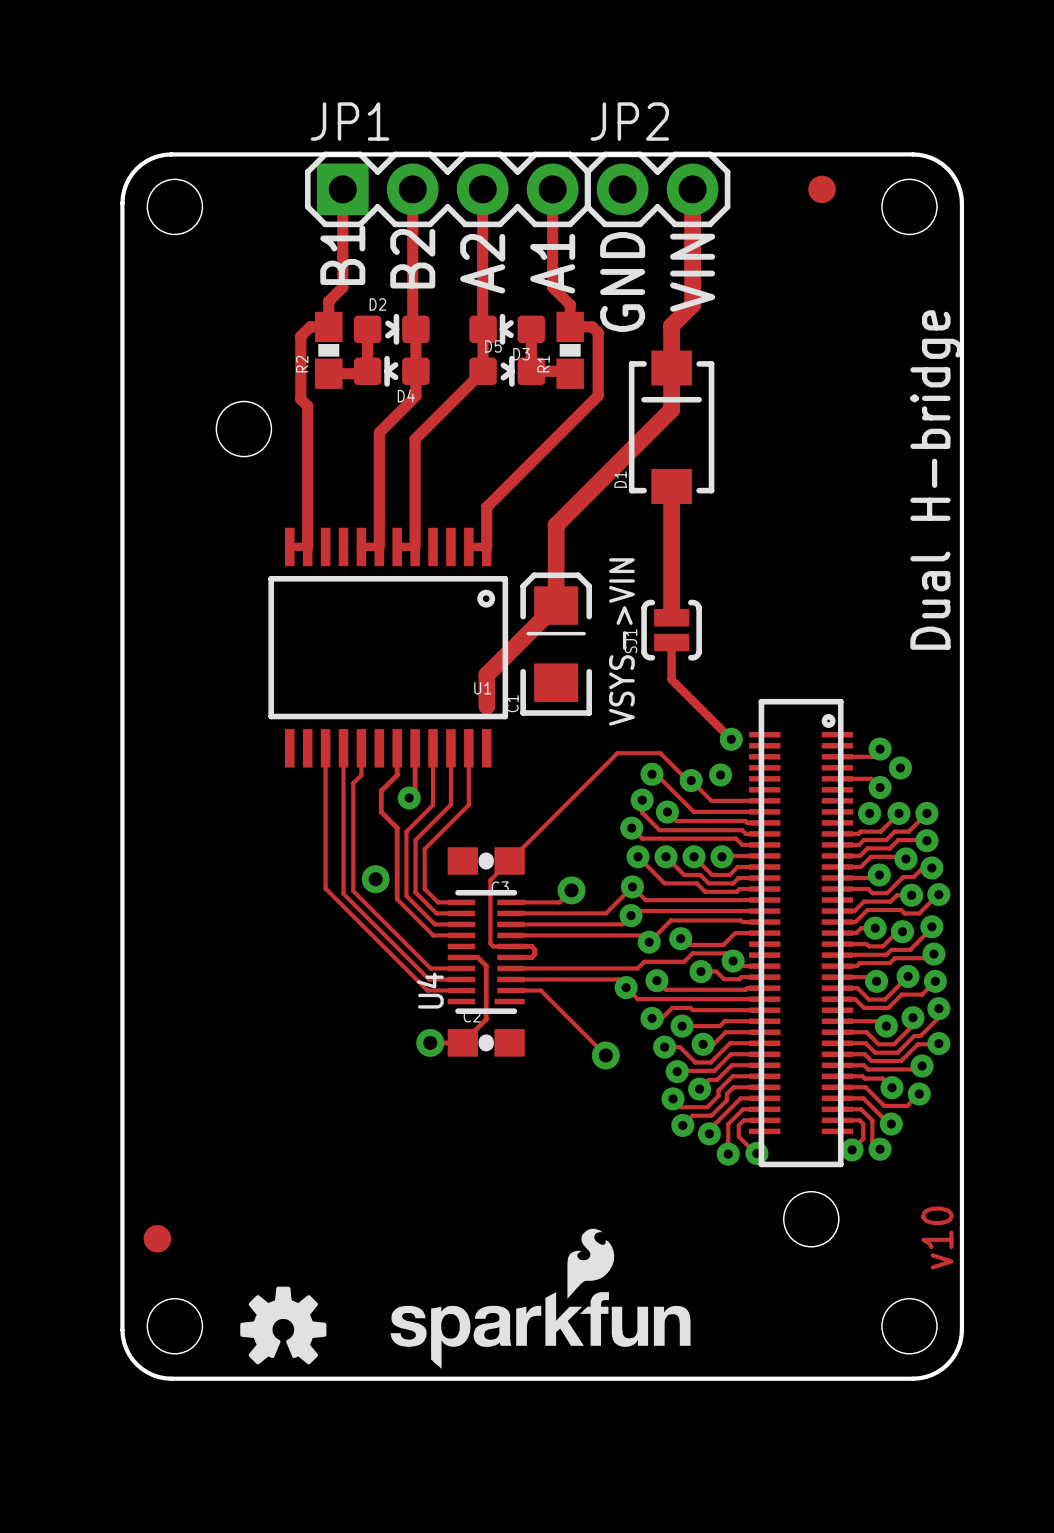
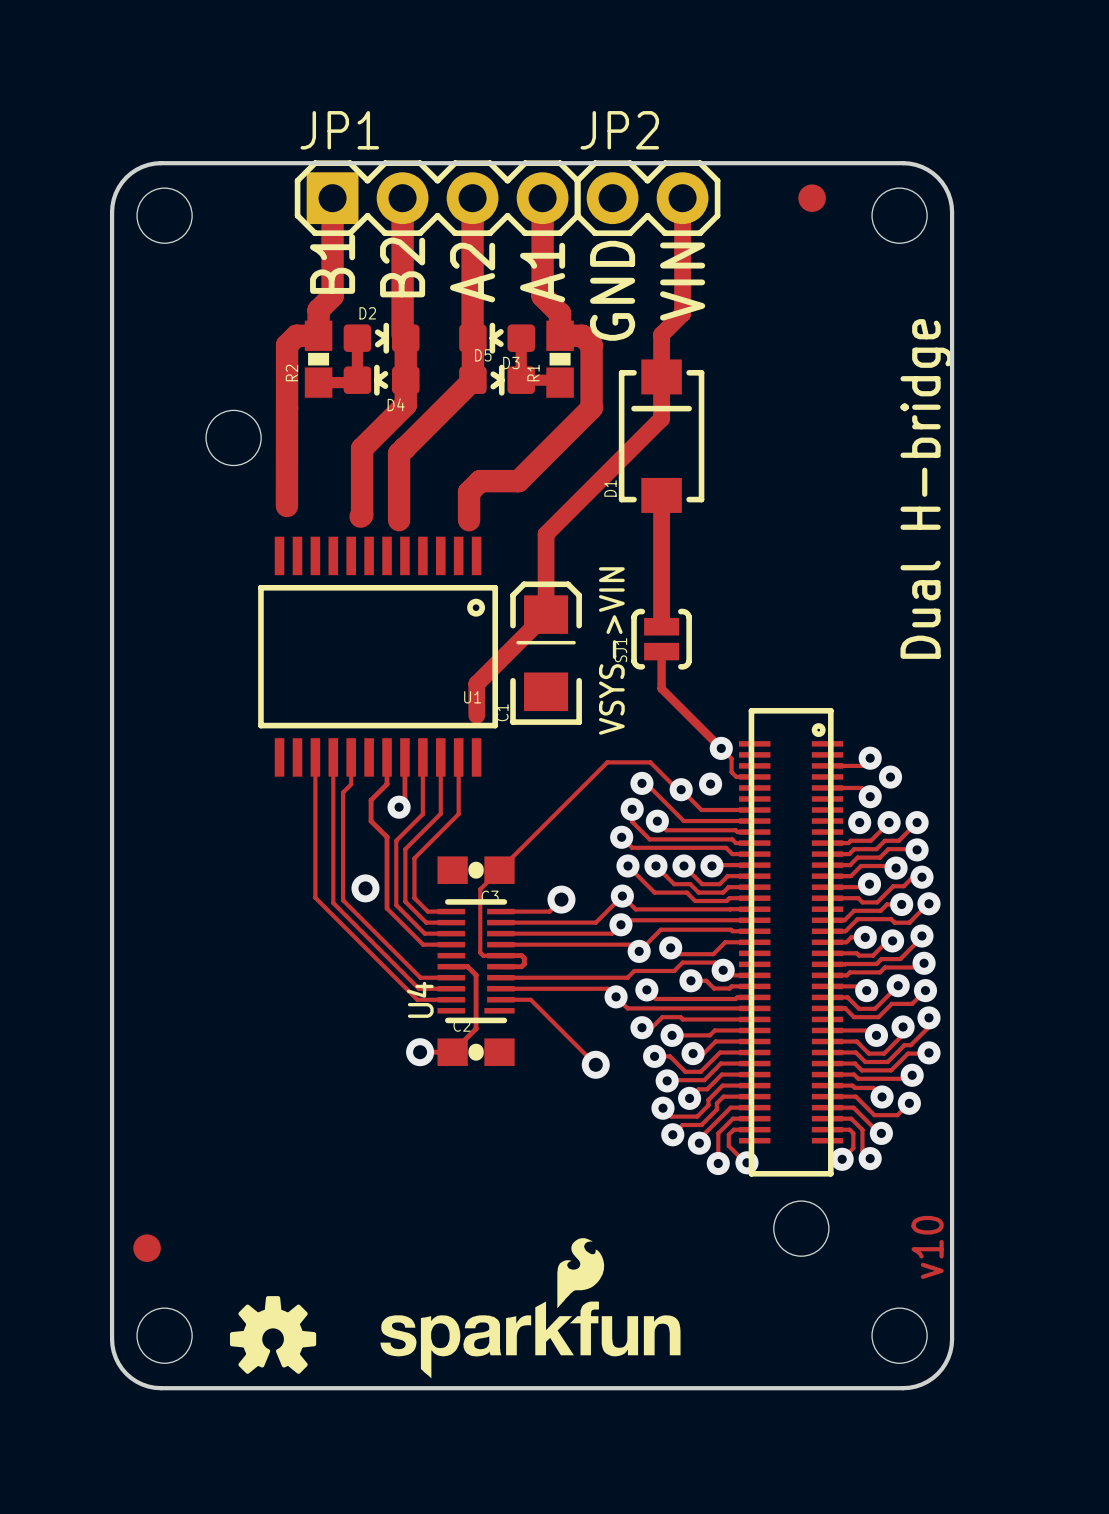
track width: thin (342, 189) (342, 287) (328, 301) (328, 326) (310, 326) -> thick (332, 198) (332, 296) (318, 310) (318, 335) (300, 335)
track width: thin (412, 189) (412, 326) -> thick (402, 198) (402, 335)
track width: thin (482, 189) (482, 328) -> thick (472, 198) (472, 337)
track width: thin (552, 189) (552, 287) (570, 304) (570, 326) (592, 326) (598, 332) -> thick (542, 198) (542, 296) (560, 313) (560, 335) (582, 335) (588, 341)
track: (310, 326) (300, 336) (300, 399) (307, 406) (307, 546) (289, 546) -> (300, 335) (296, 335) (287, 345) (286, 506) (290, 509)
track width: thin (415, 329) (415, 396) (379, 432) -> thick (405, 338) (405, 405) (369, 441)
track width: thin (483, 329) (483, 371) (415, 439) -> thick (472, 338) (472, 380) (404, 448)
track: (598, 332) (598, 395) (486, 507) (486, 546) (468, 546) -> (588, 341) (591, 345) (591, 408) (518, 481) (480, 481) (469, 492) (469, 520)
track: (379, 432) (379, 546) (361, 546) -> (369, 441) (362, 448) (362, 515) (360, 516)
track: (415, 439) (415, 546) (397, 546) -> (404, 448) (399, 453) (399, 520)
track: none -> (721, 748) (731, 758) (731, 772) (736, 776) (754, 776)

